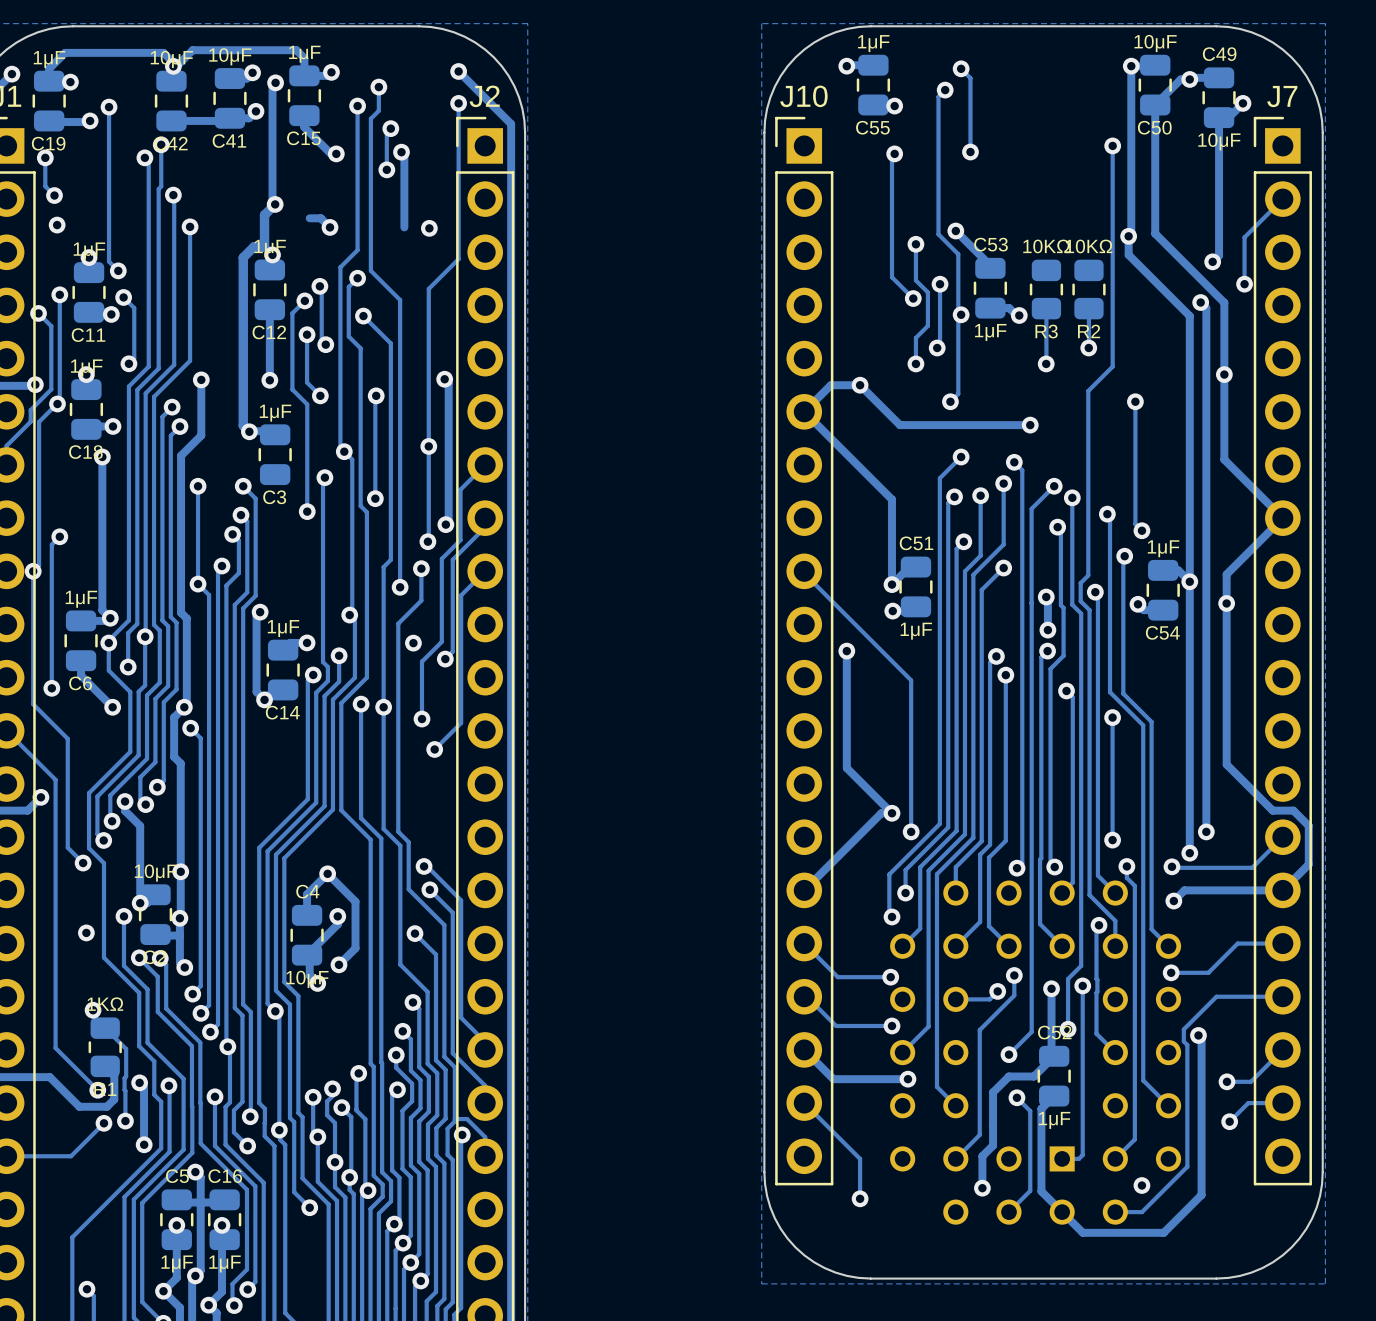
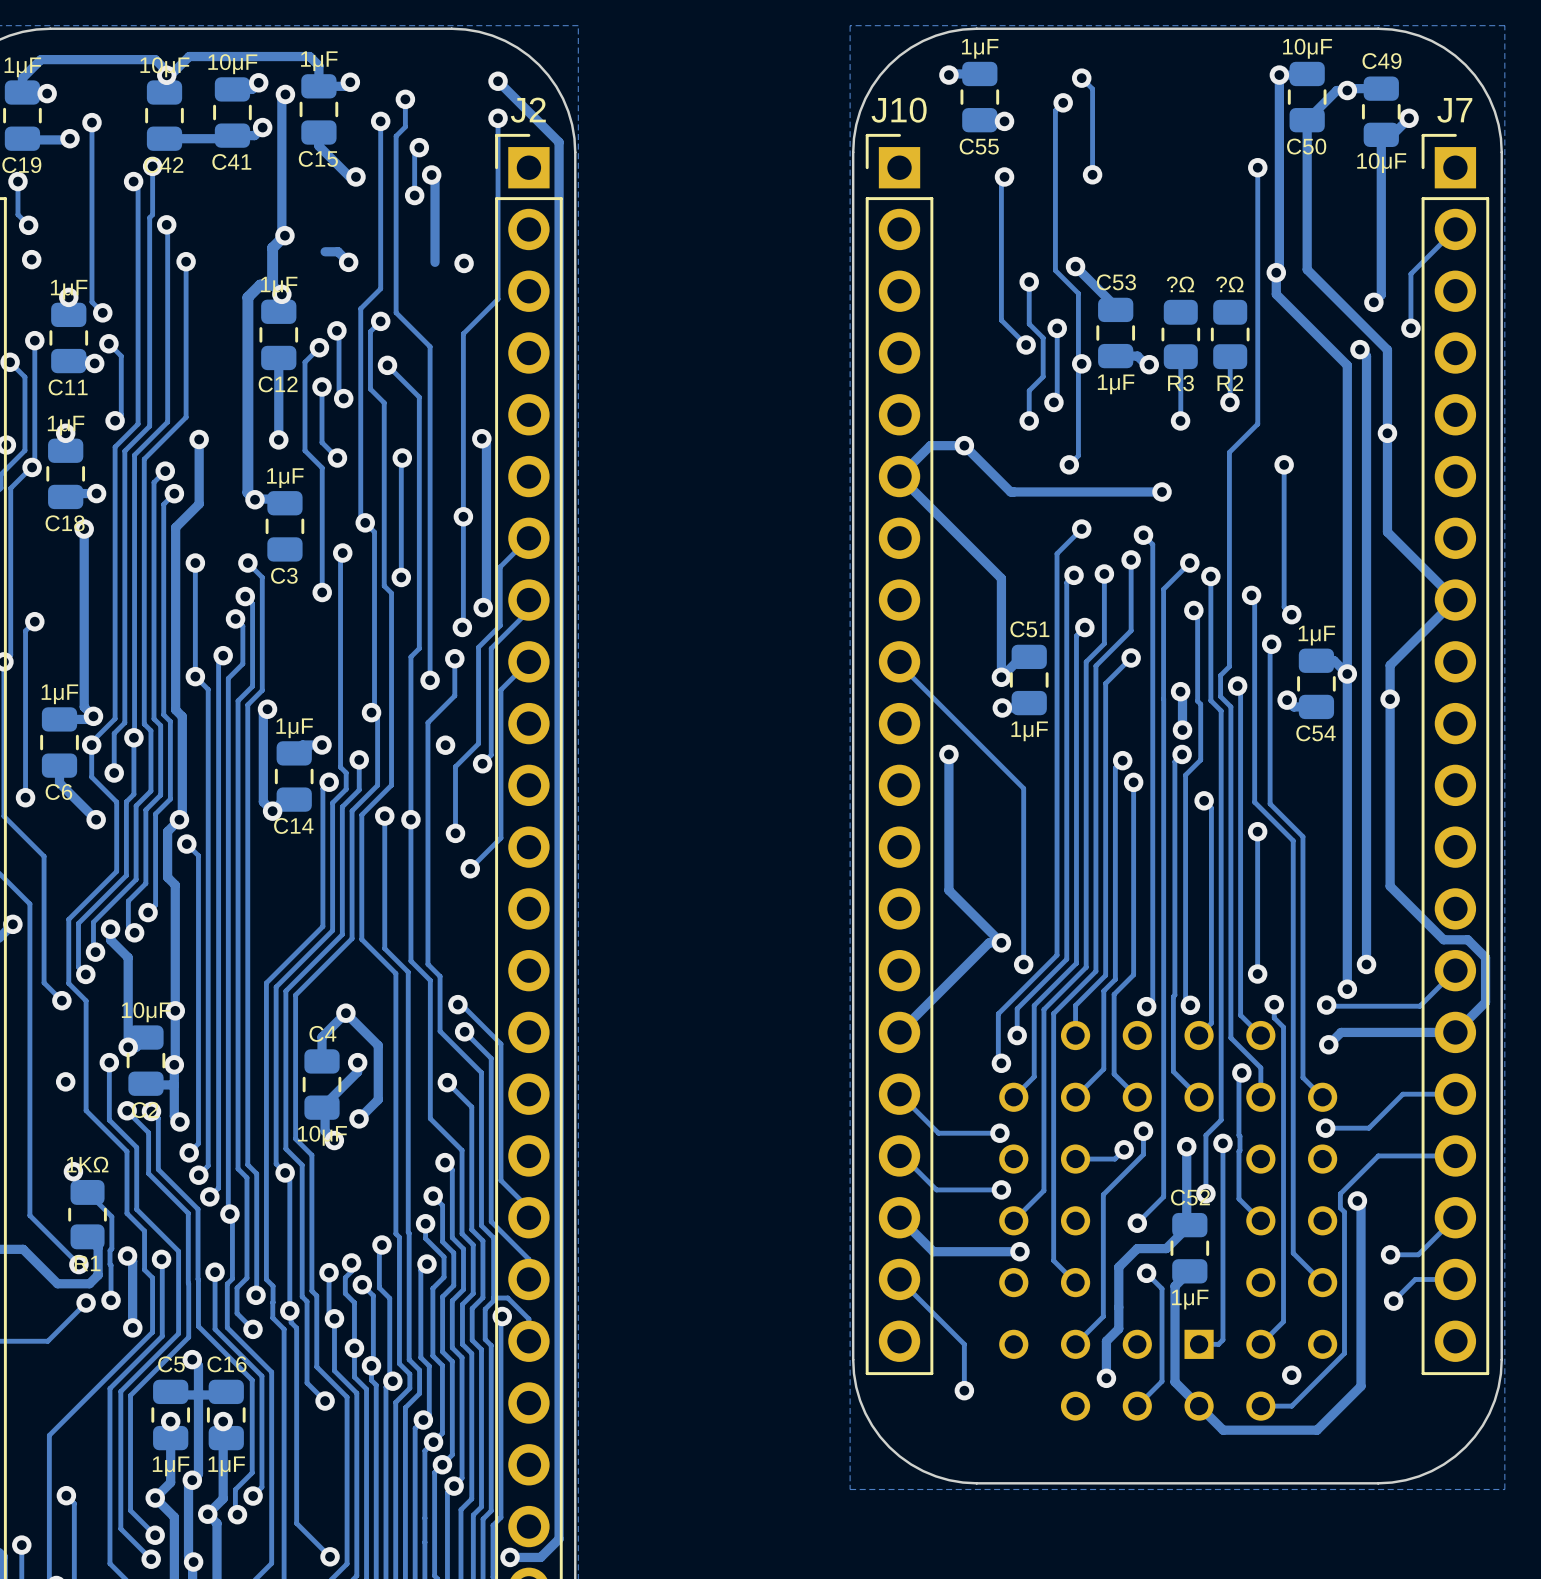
R3 value: 10KΩ (1046, 246) -> ?Ω (1180, 284)
R2 value: 10KΩ (1089, 246) -> ?Ω (1229, 284)

